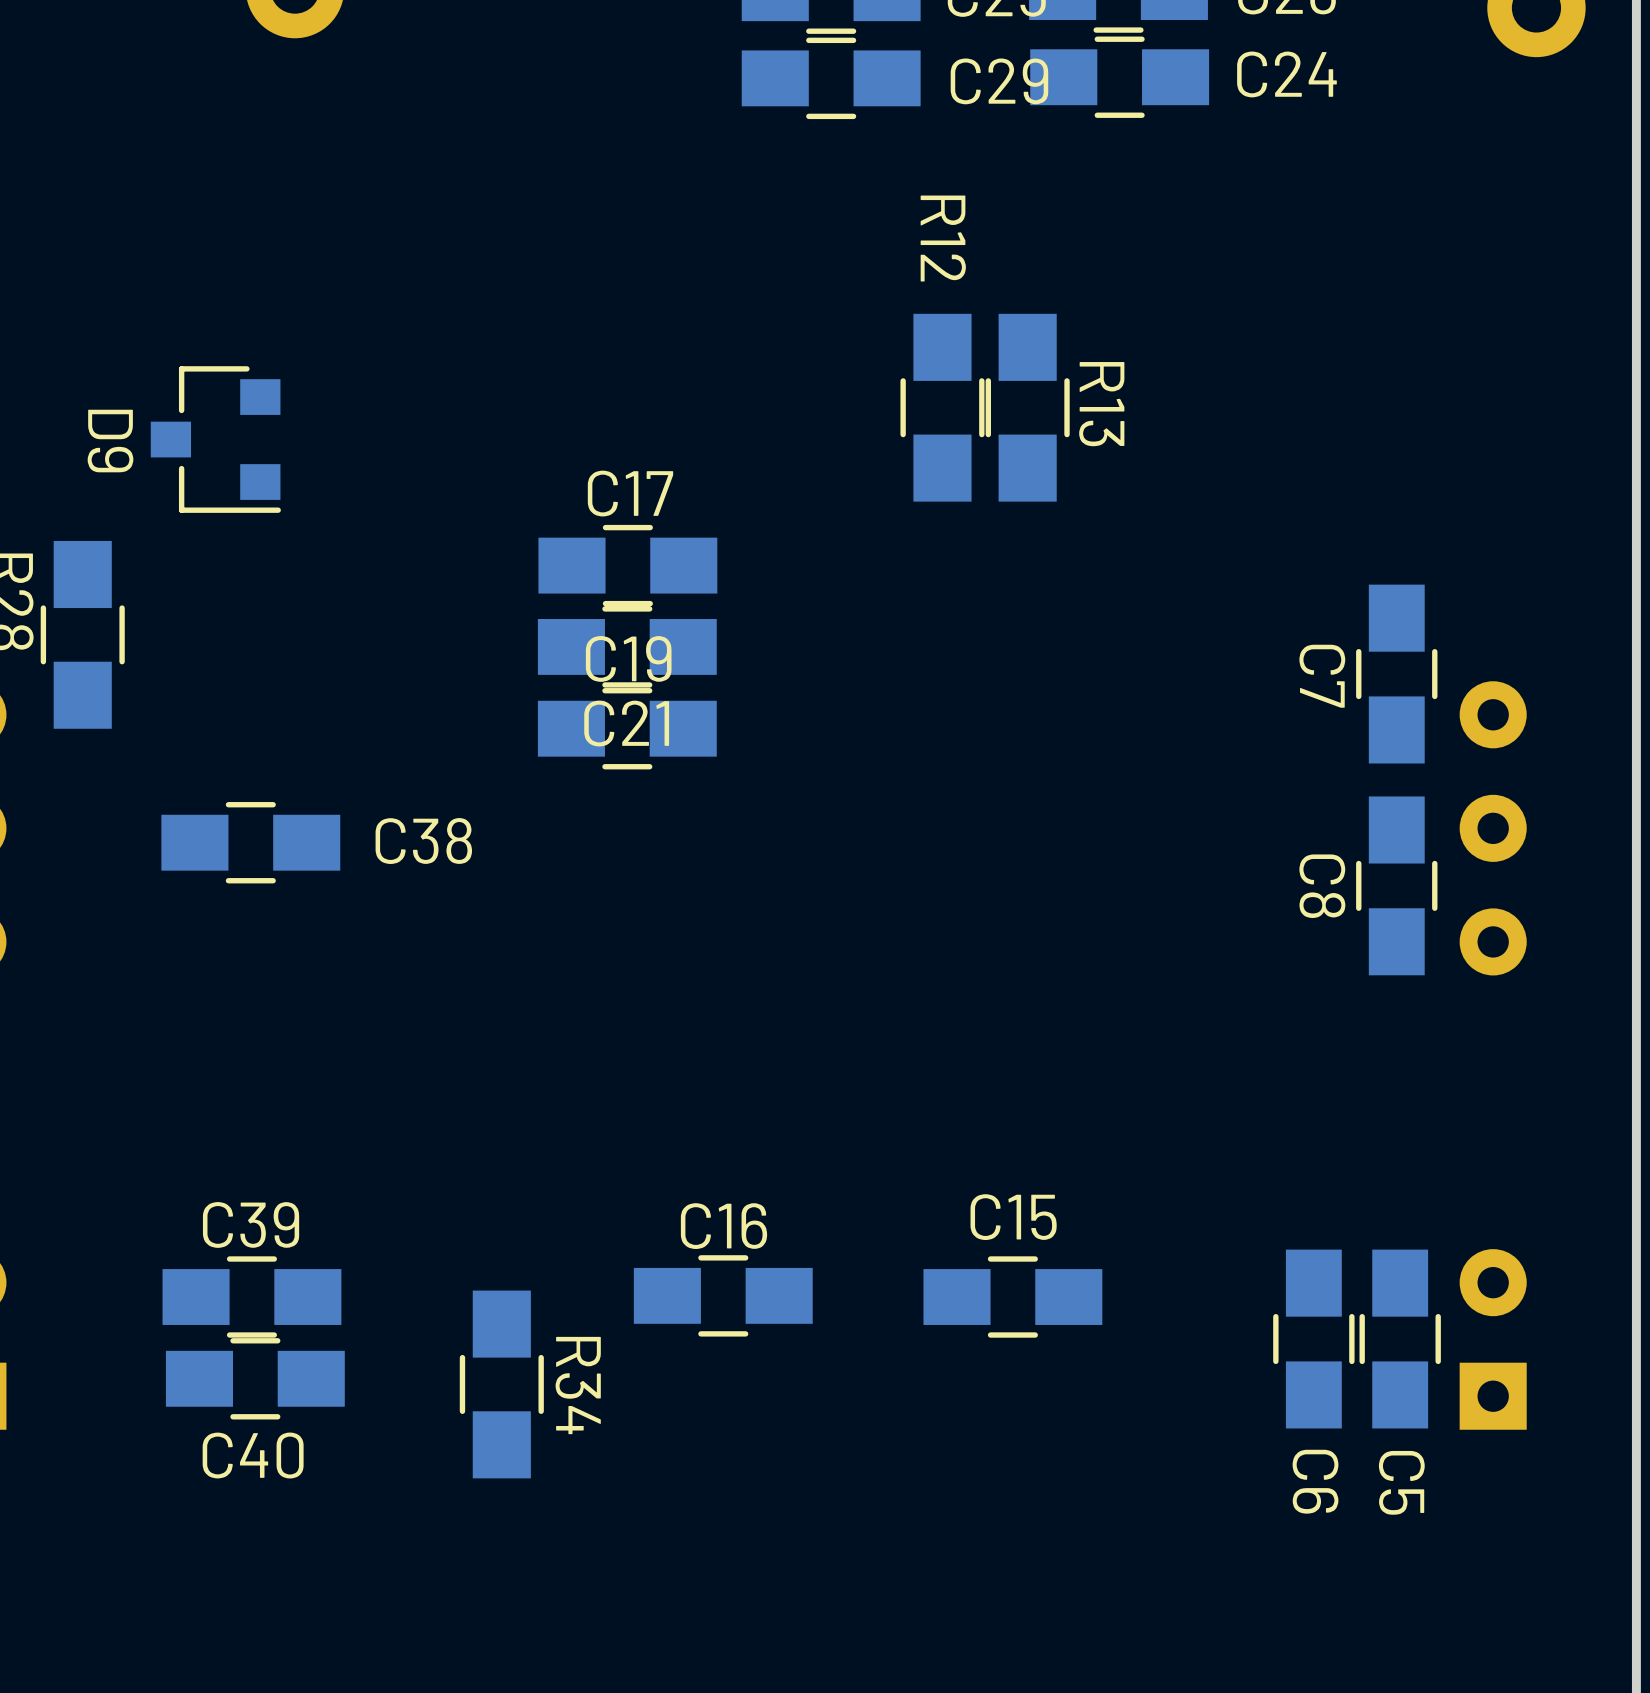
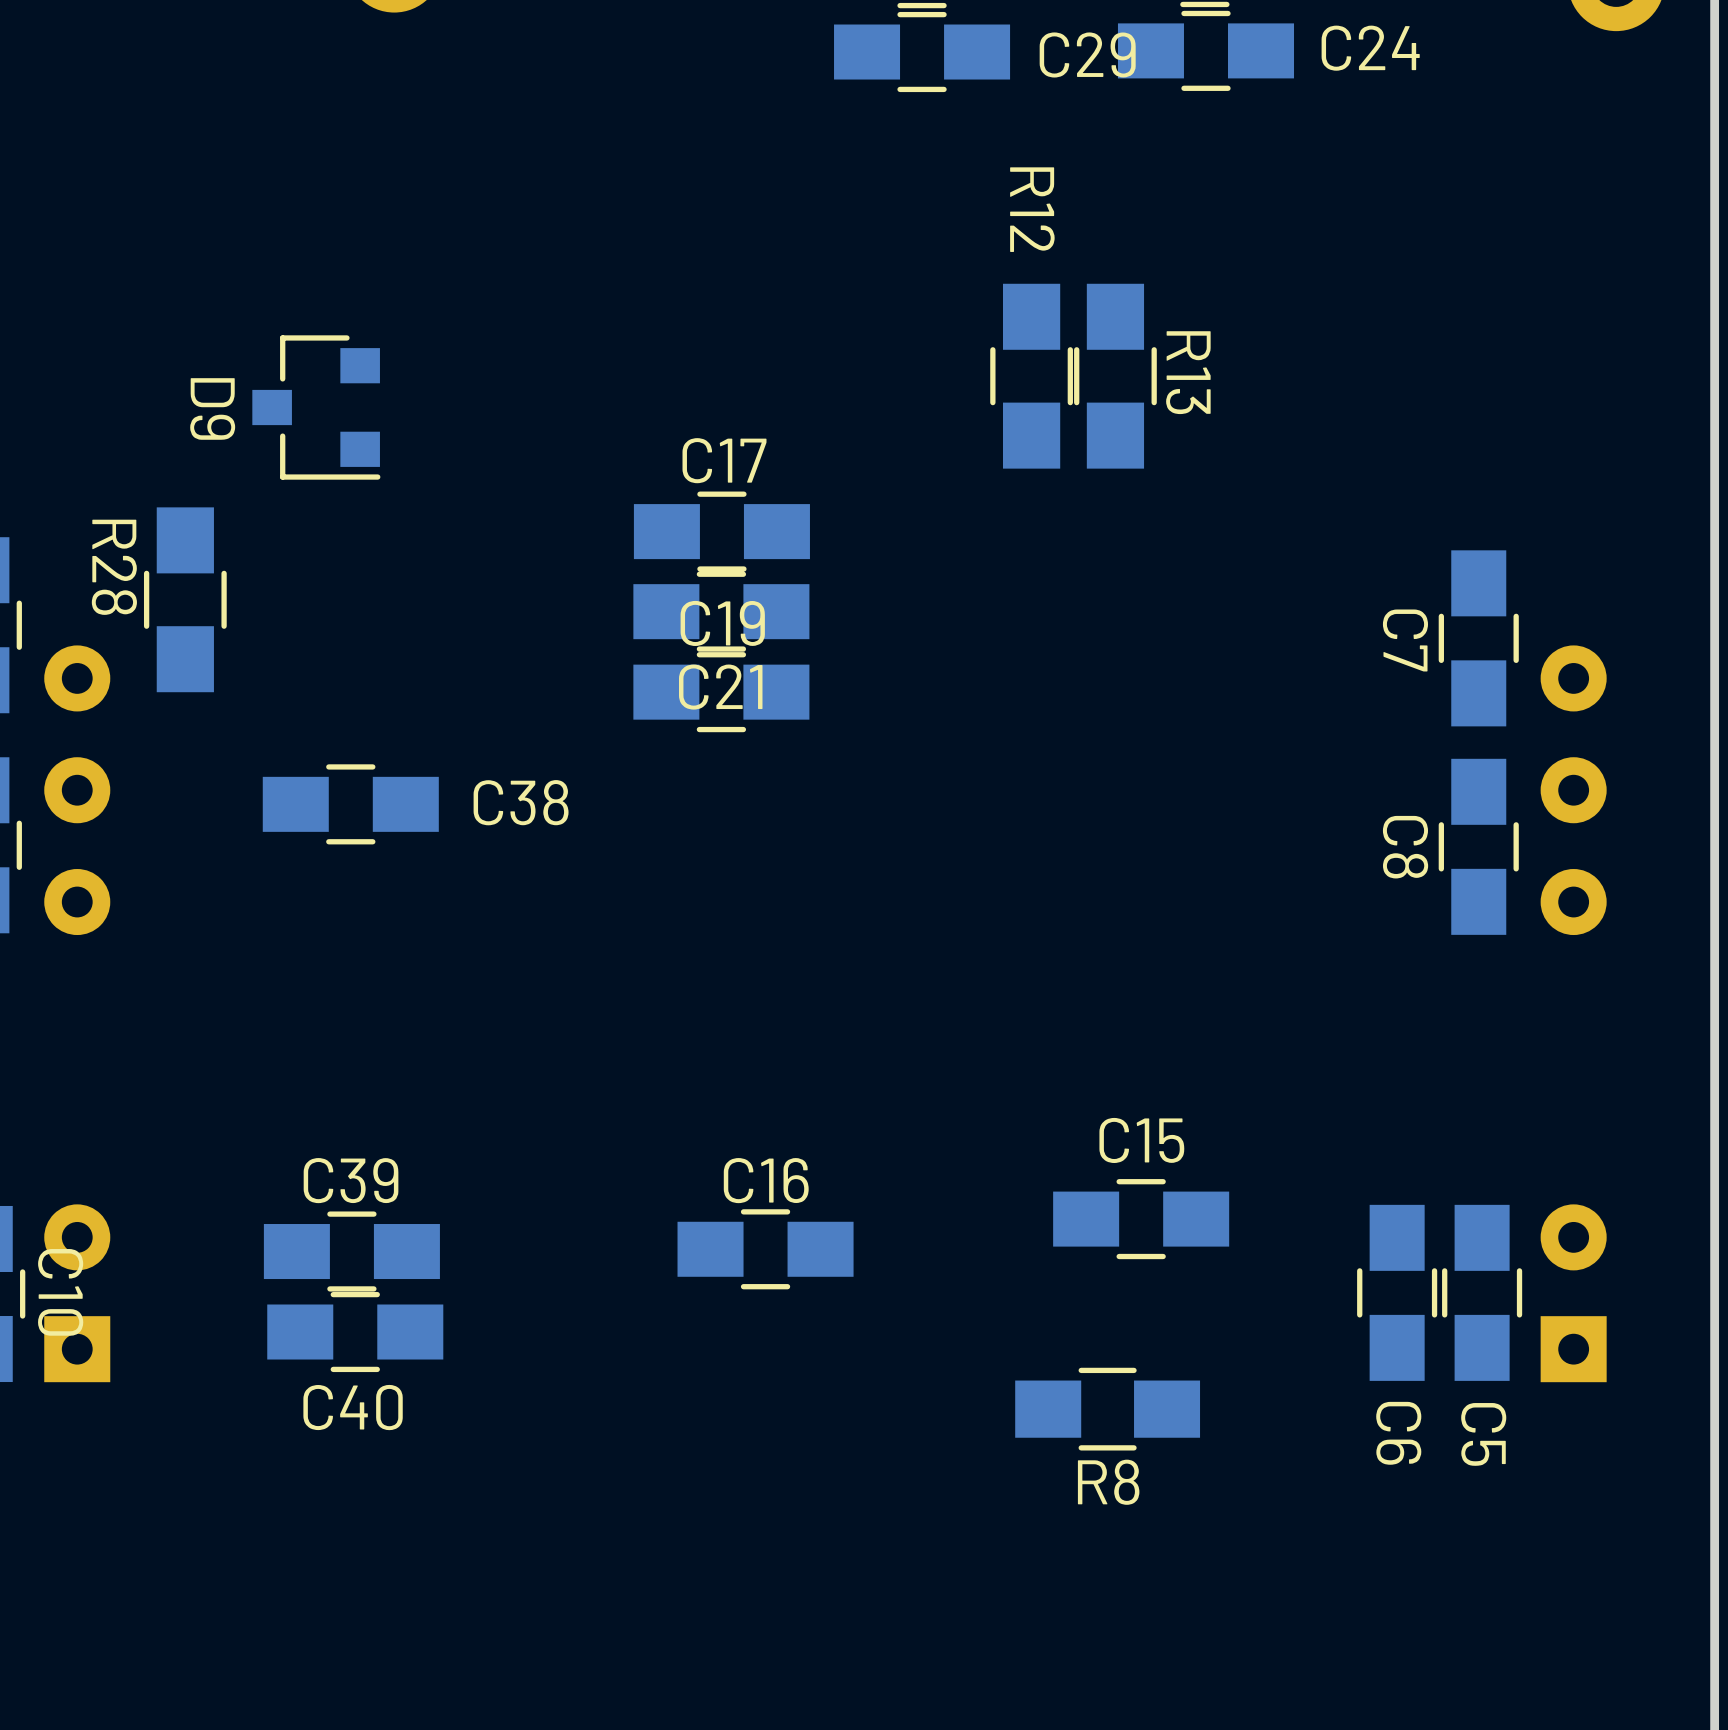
C16 position: (723, 1295) -> (765, 1249)
C15 position: (1012, 1297) -> (1141, 1219)
R34: (501, 1384) -> none
R8: none -> (1107, 1409)

